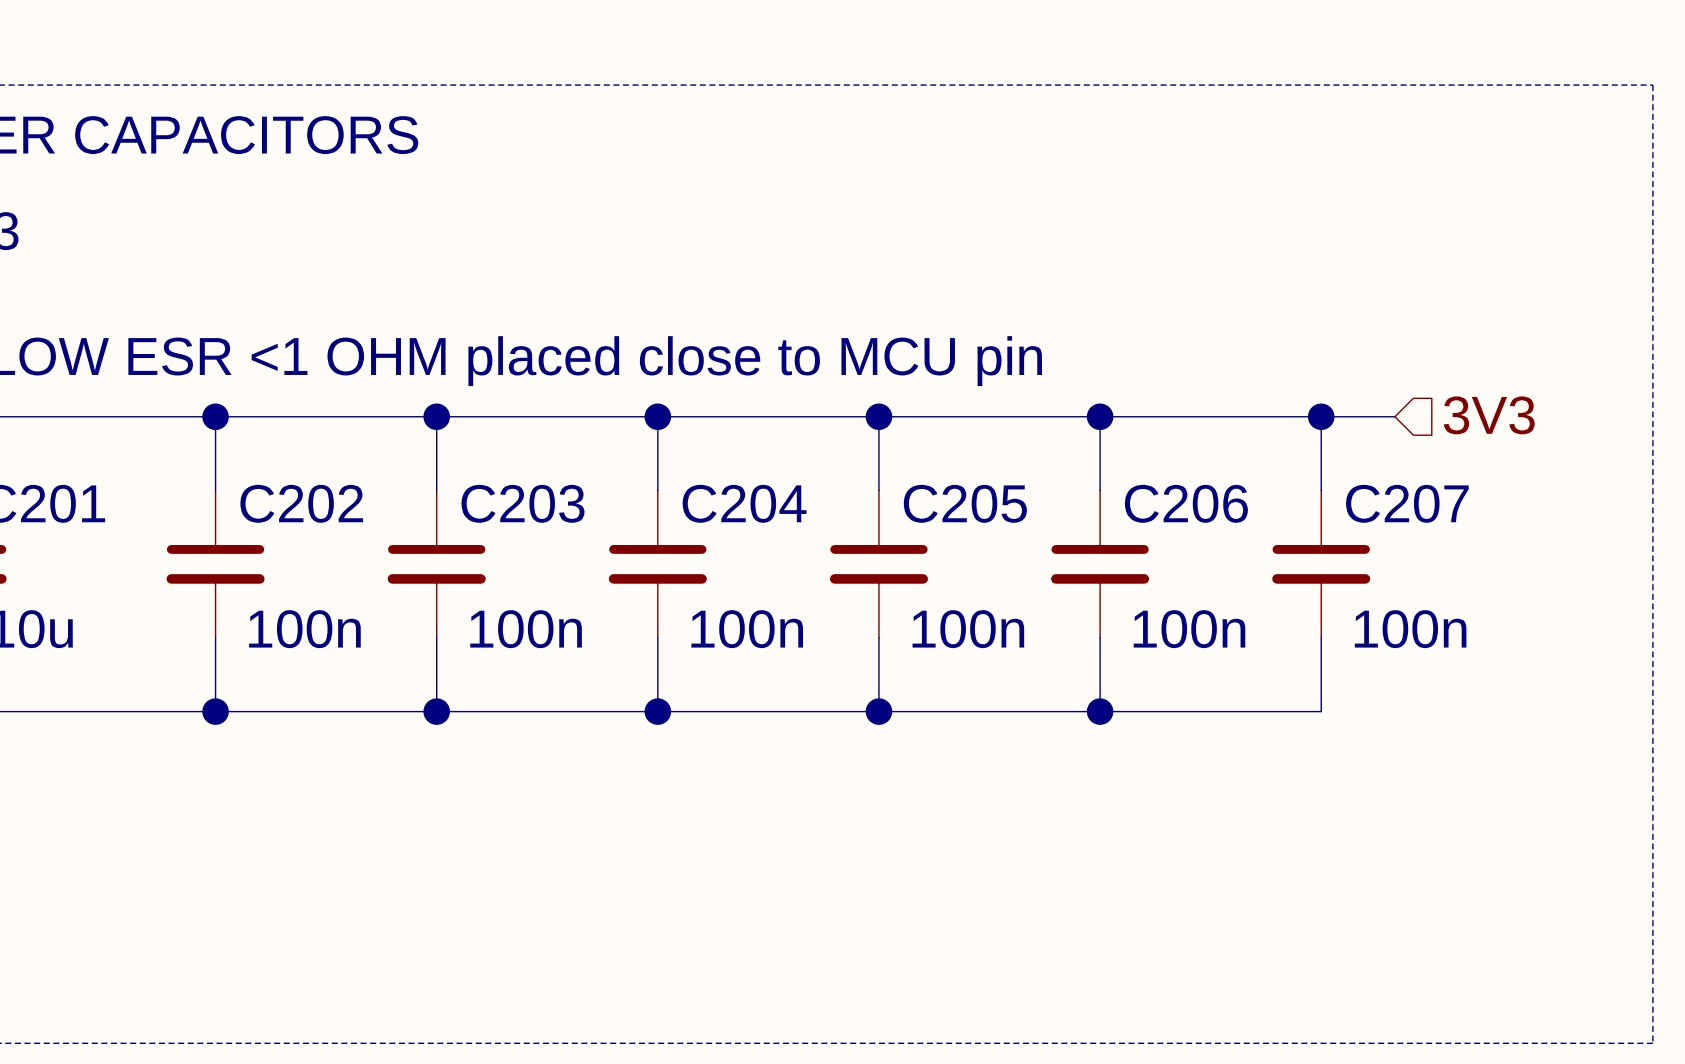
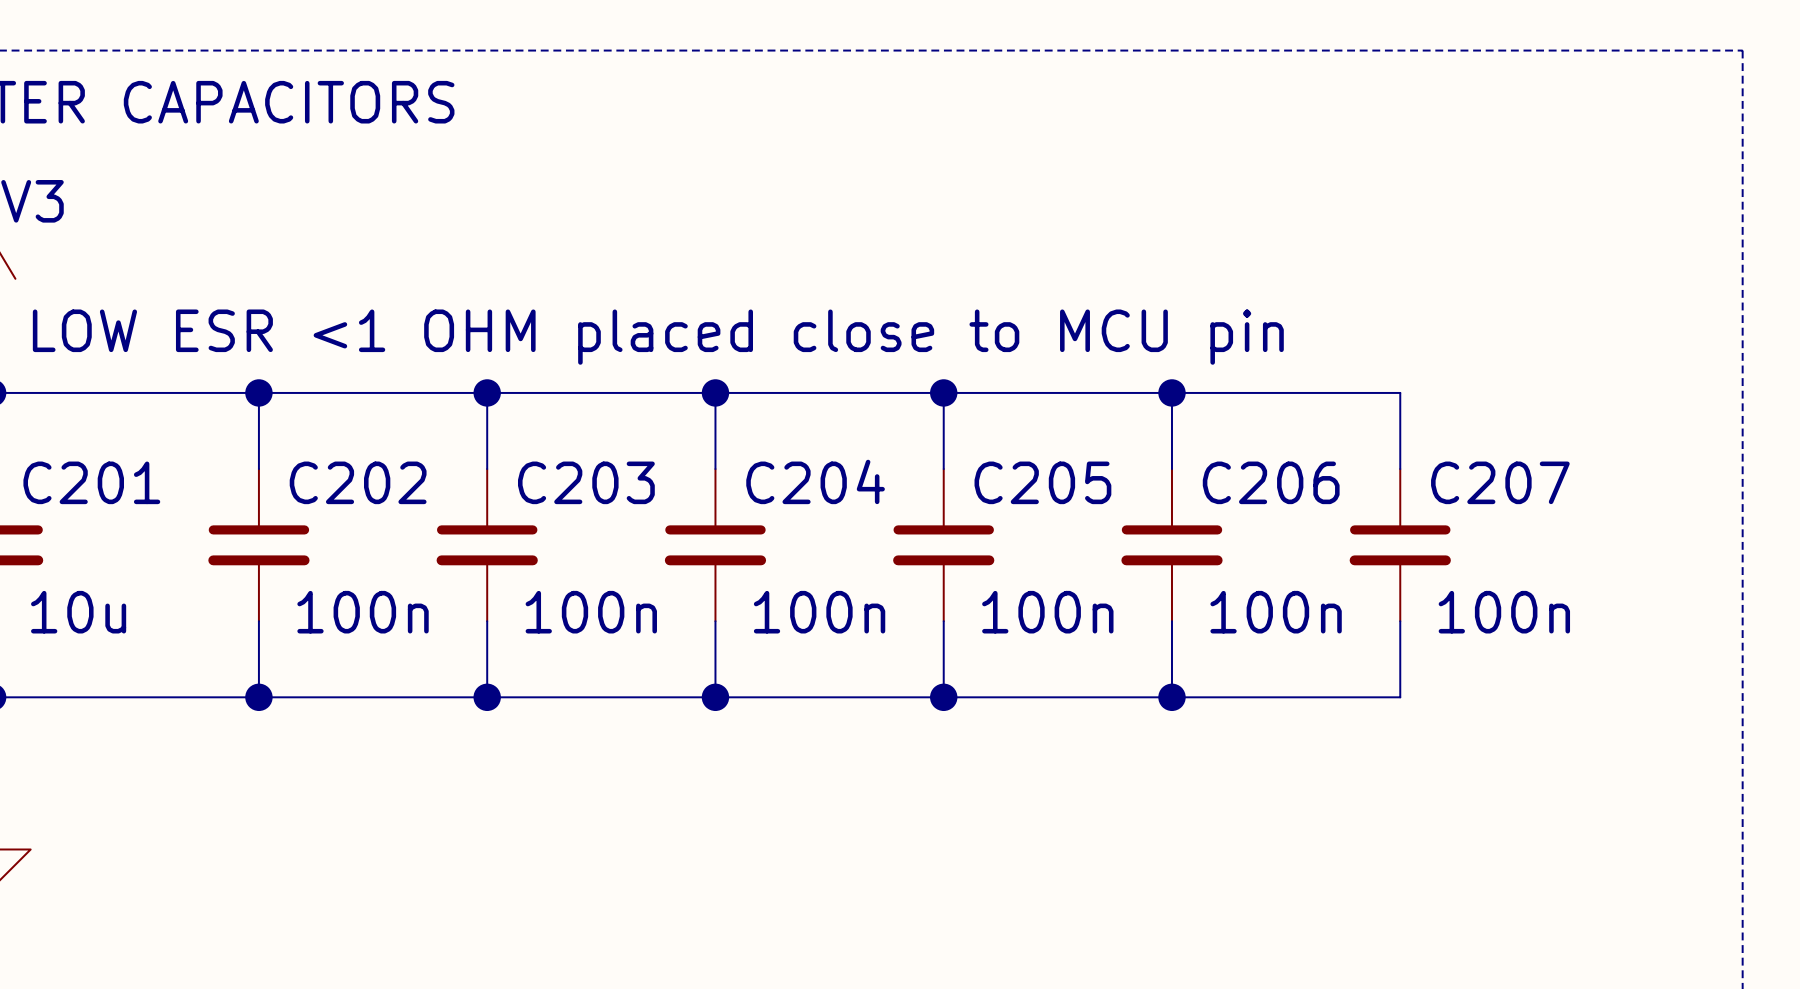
hierarchical label: 3V3 (1489, 415) -> none
wire: (1321, 416) (1394, 416) -> none
junction: (1321, 416) -> none

